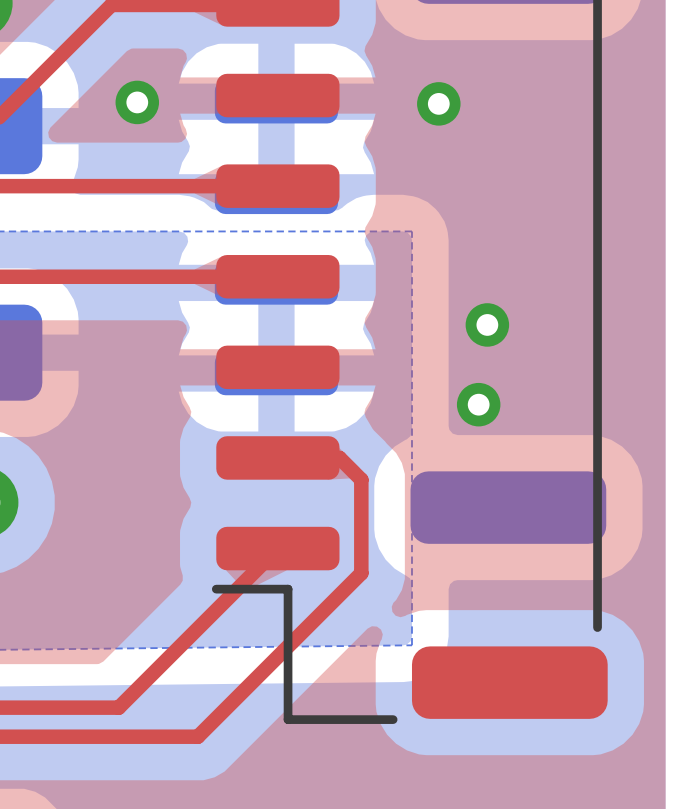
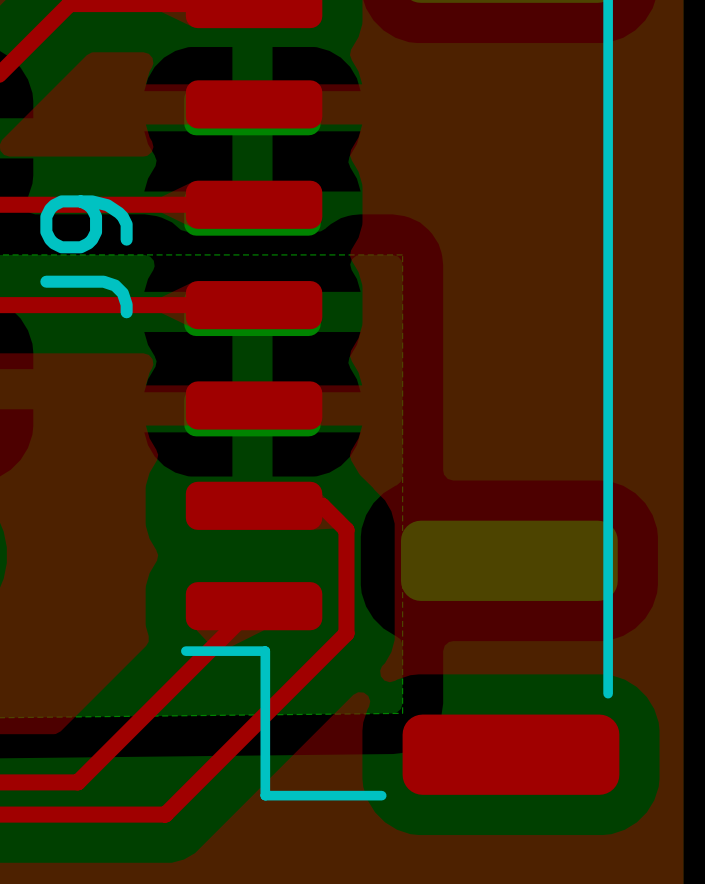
via: (137, 102) -> none
via: (438, 103) -> none
J9 name: none -> J9 (86, 256)
via: (487, 324) -> none
via: (478, 404) -> none

